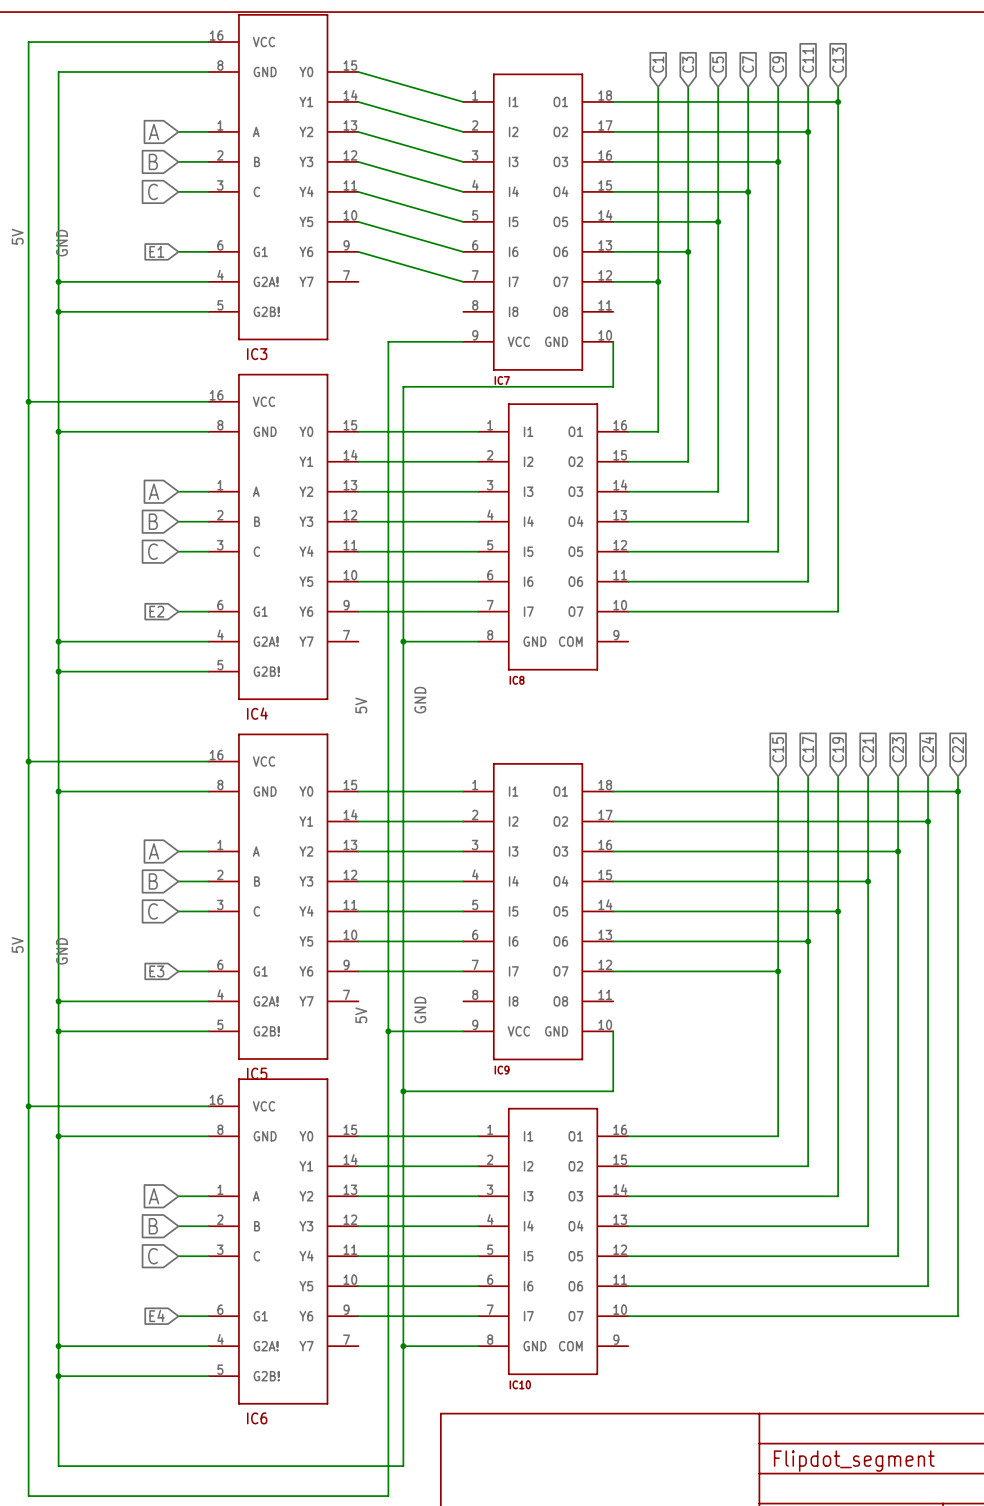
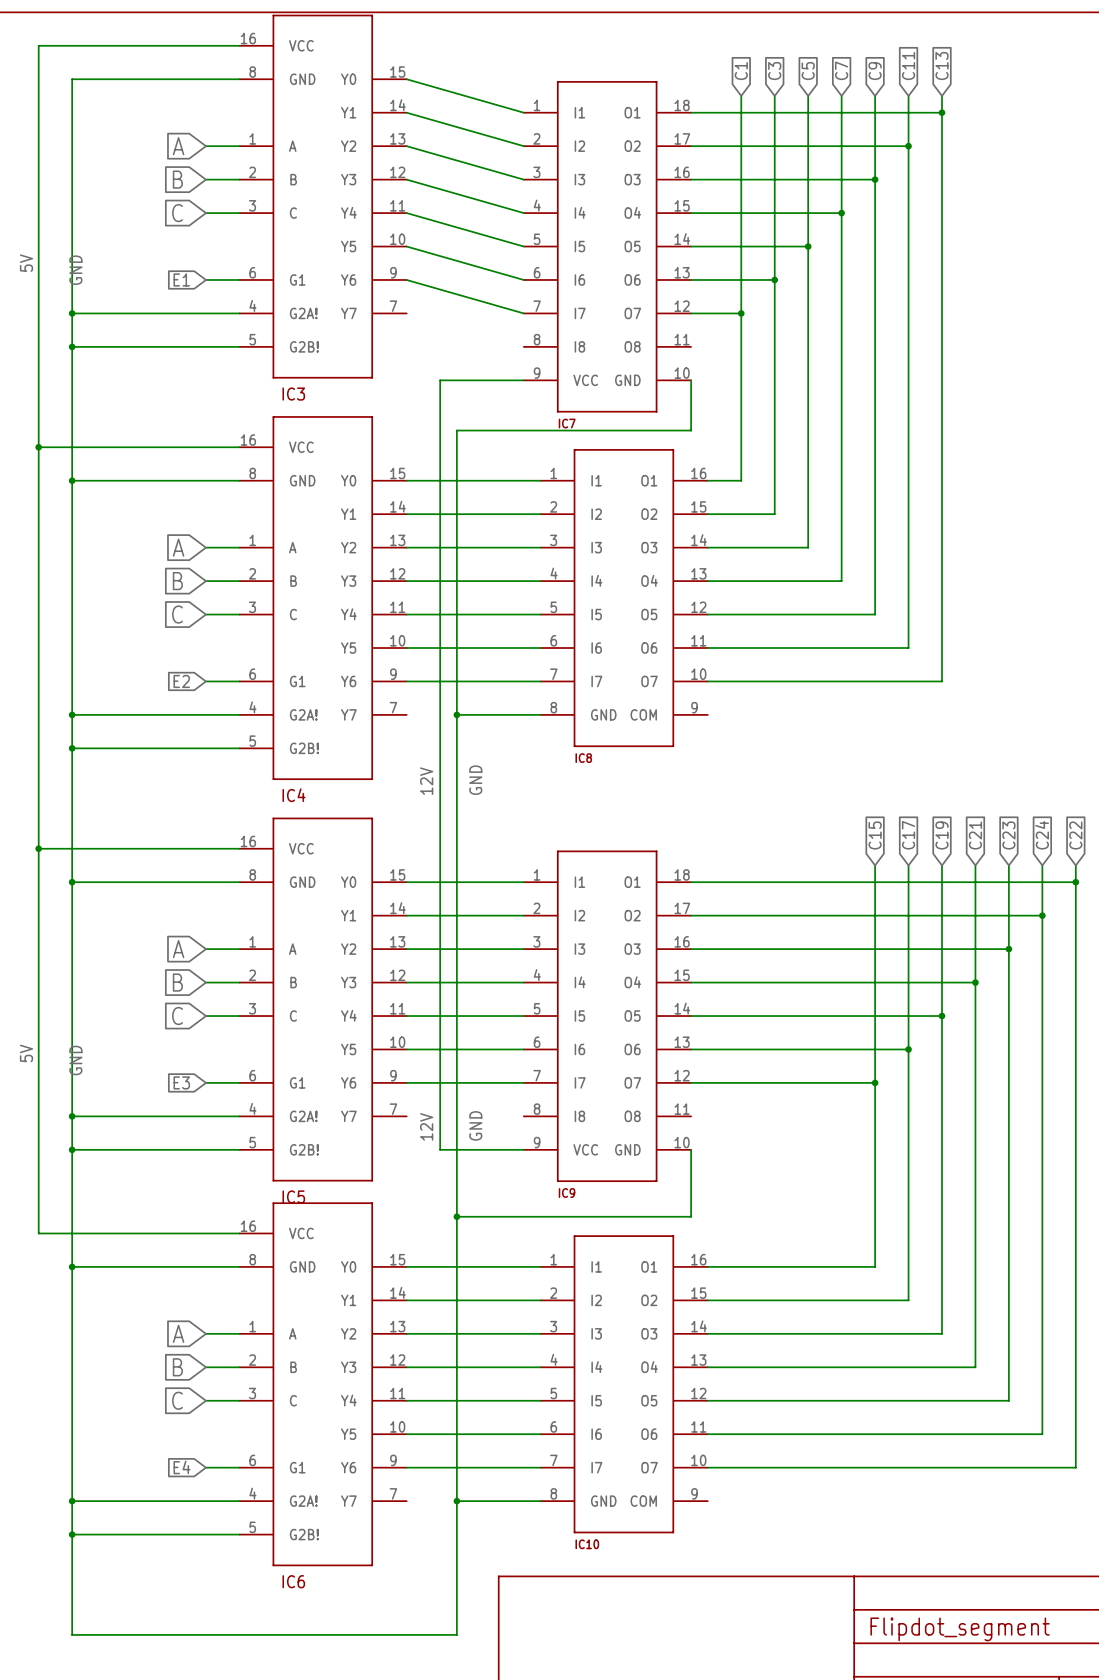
label: none -> 12V (426, 781)
label: 5V (361, 705) -> none
label: none -> 12V (426, 1126)
label: 5V (361, 1015) -> none
wire: (388, 1031) (388, 1496) (28, 1496) (28, 1106) -> none
junction: (388, 1031) -> none
junction: (28, 1106) -> none

